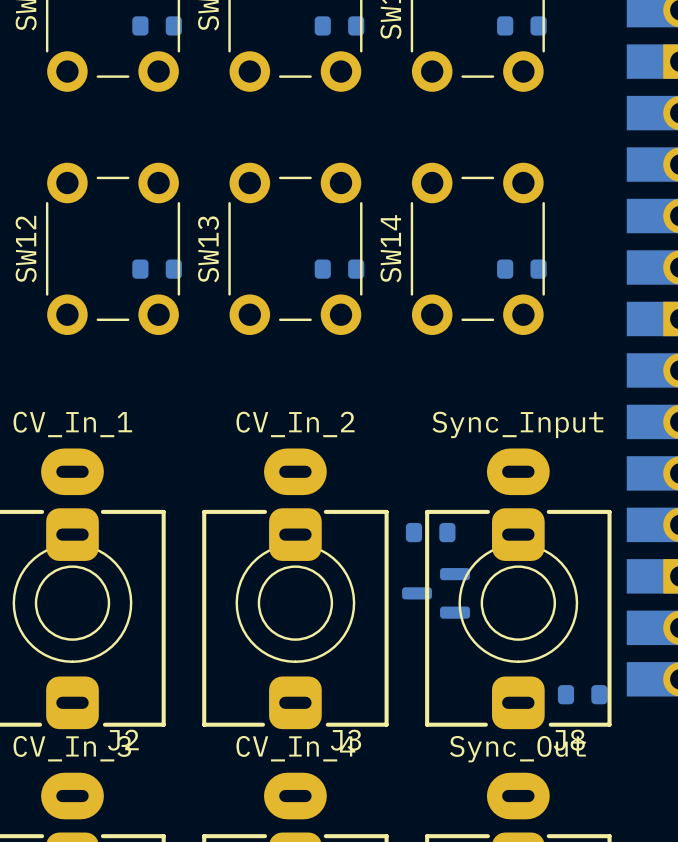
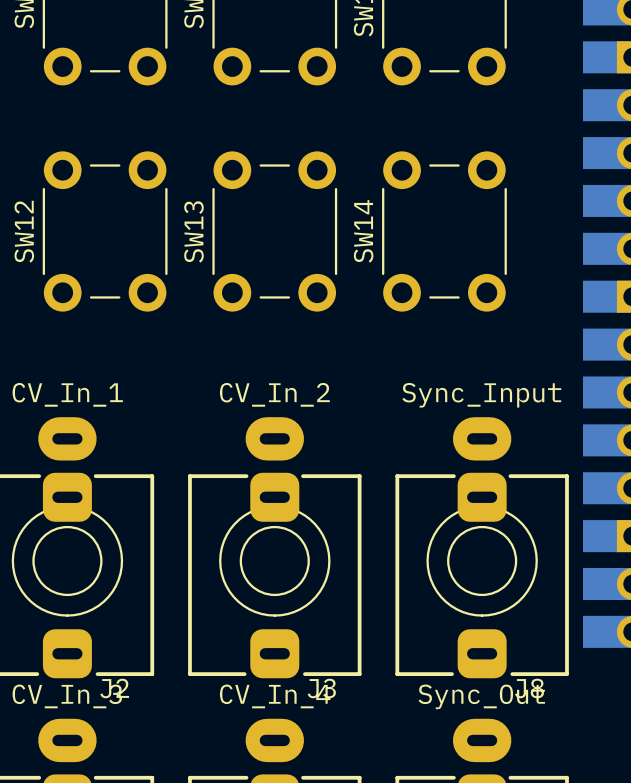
part: (157, 25) -> none
part: (339, 25) -> none
part: (521, 25) -> none
part: (157, 269) -> none
part: (339, 269) -> none
part: (521, 269) -> none
part: (430, 532) -> none
part: (436, 593) -> none
part: (582, 694) -> none

